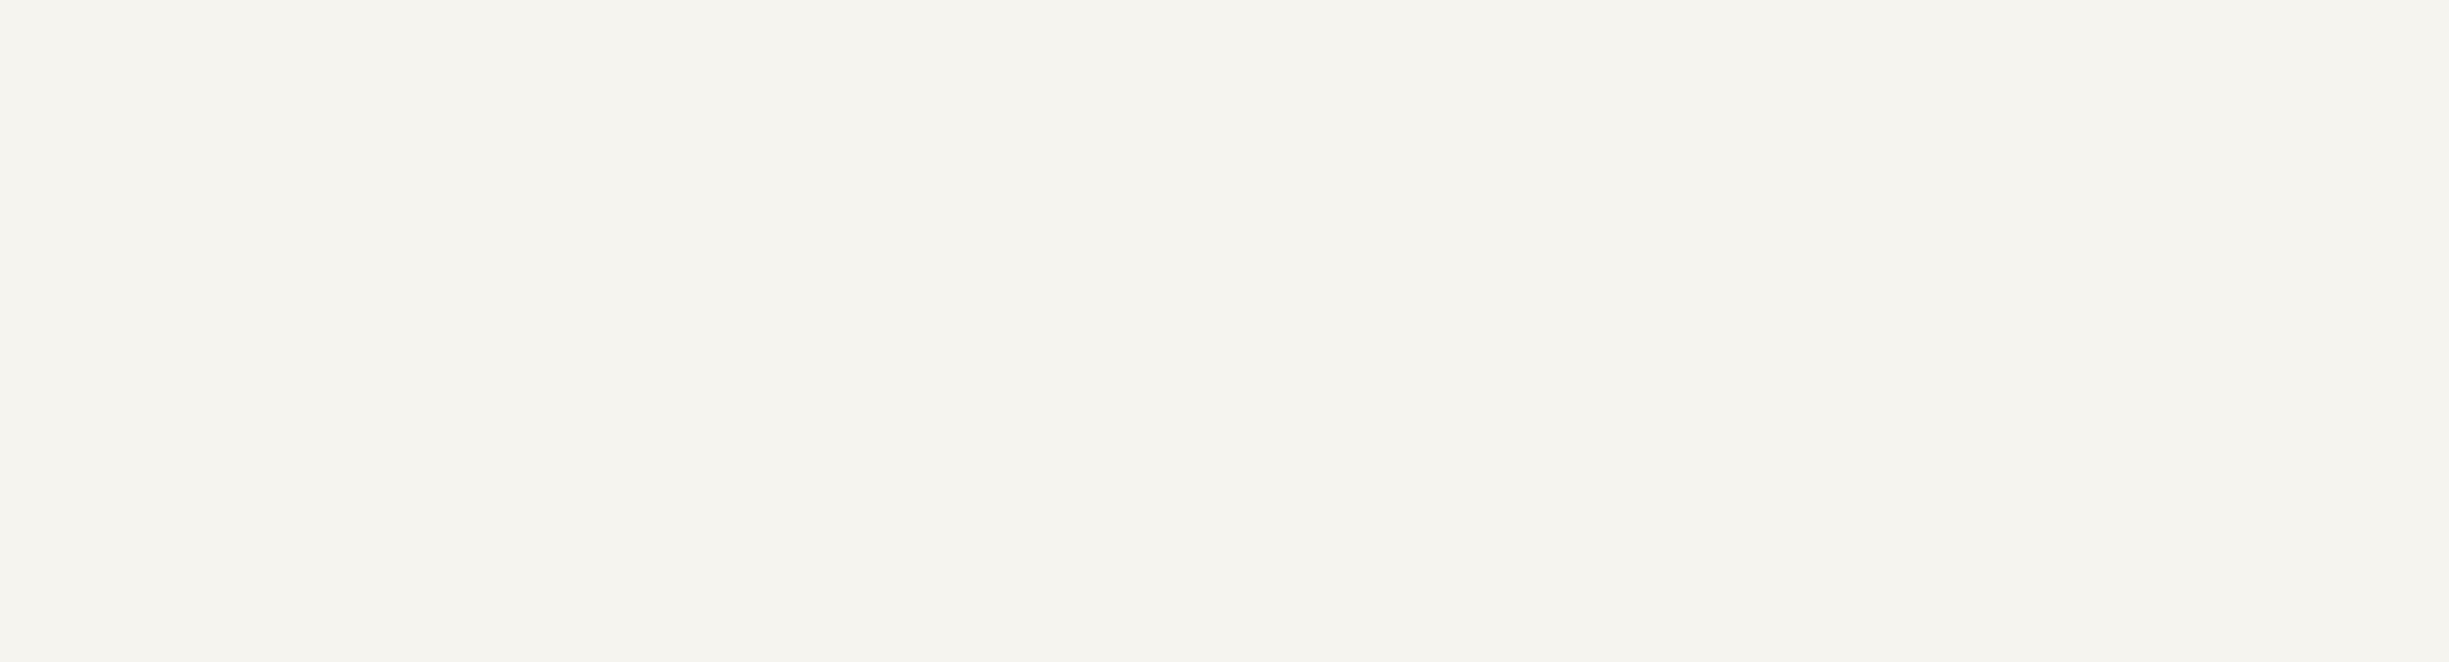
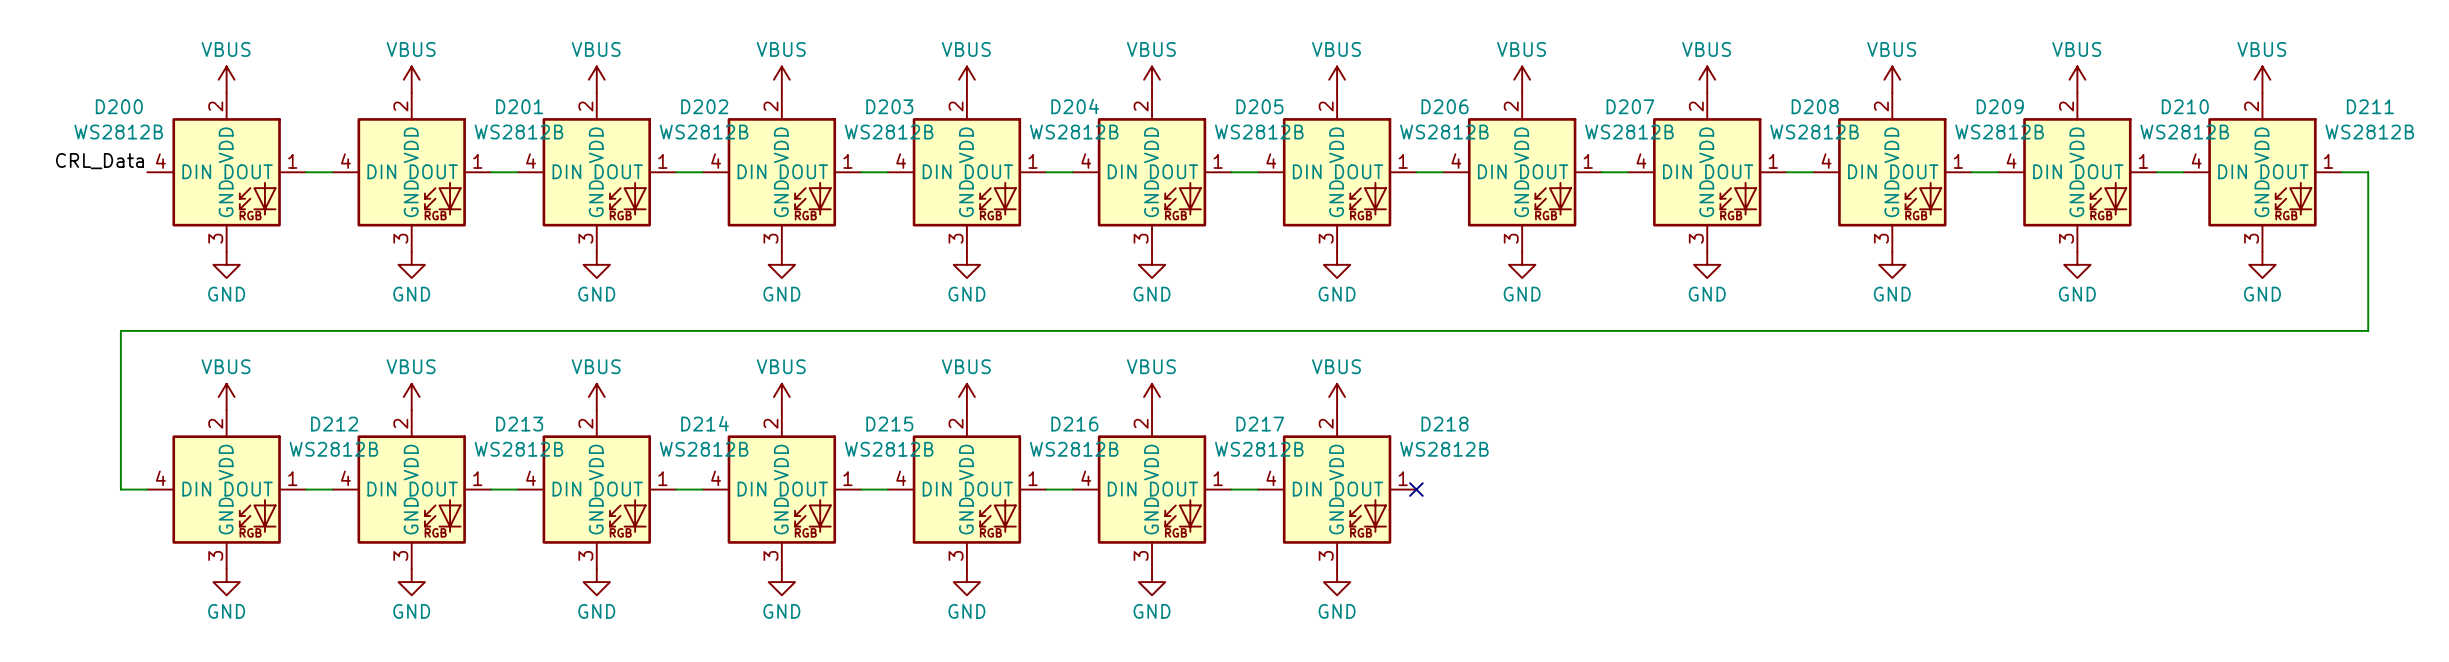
power symbol: none -> VBUS (226, 79)
power symbol: none -> VBUS (411, 79)
power symbol: none -> VBUS (596, 79)
power symbol: none -> VBUS (781, 79)
power symbol: none -> VBUS (966, 79)
power symbol: none -> VBUS (1152, 79)
power symbol: none -> VBUS (1337, 79)
power symbol: none -> VBUS (1522, 79)
power symbol: none -> VBUS (1707, 79)
power symbol: none -> VBUS (1892, 79)
power symbol: none -> VBUS (2077, 79)
power symbol: none -> VBUS (2262, 79)
label: none -> CRL_Data (100, 161)
D200: none -> WS2812B (226, 172)
wire: none -> (305, 172) (332, 172)
D201: none -> WS2812B (411, 172)
wire: none -> (491, 172) (517, 172)
D202: none -> WS2812B (596, 172)
wire: none -> (676, 172) (702, 172)
D203: none -> WS2812B (781, 172)
wire: none -> (861, 172) (887, 172)
D204: none -> WS2812B (966, 172)
wire: none -> (1046, 172) (1072, 172)
D205: none -> WS2812B (1152, 172)
wire: none -> (1231, 172) (1257, 172)
D206: none -> WS2812B (1337, 172)
wire: none -> (1416, 172) (1442, 172)
D207: none -> WS2812B (1522, 172)
wire: none -> (1601, 172) (1627, 172)
D208: none -> WS2812B (1707, 172)
wire: none -> (1786, 172) (1812, 172)
D209: none -> WS2812B (1892, 172)
wire: none -> (1971, 172) (1998, 172)
D210: none -> WS2812B (2077, 172)
wire: none -> (2156, 172) (2183, 172)
D211: none -> WS2812B (2262, 172)
wire: none -> (2341, 172) (2368, 172) (2368, 330) (120, 330) (120, 489) (147, 489)
power symbol: none -> GND (226, 264)
power symbol: none -> GND (411, 264)
power symbol: none -> GND (596, 264)
power symbol: none -> GND (781, 264)
power symbol: none -> GND (966, 264)
power symbol: none -> GND (1152, 264)
power symbol: none -> GND (1337, 264)
power symbol: none -> GND (1522, 264)
power symbol: none -> GND (1707, 264)
power symbol: none -> GND (1892, 264)
power symbol: none -> GND (2077, 264)
power symbol: none -> GND (2262, 264)
power symbol: none -> VBUS (226, 397)
power symbol: none -> VBUS (411, 397)
power symbol: none -> VBUS (596, 397)
power symbol: none -> VBUS (781, 397)
power symbol: none -> VBUS (966, 397)
power symbol: none -> VBUS (1152, 397)
power symbol: none -> VBUS (1337, 397)
D212: none -> WS2812B (226, 489)
wire: none -> (305, 489) (332, 489)
D213: none -> WS2812B (411, 489)
wire: none -> (491, 489) (517, 489)
D214: none -> WS2812B (596, 489)
wire: none -> (676, 489) (702, 489)
D215: none -> WS2812B (781, 489)
wire: none -> (861, 489) (887, 489)
D216: none -> WS2812B (966, 489)
wire: none -> (1046, 489) (1072, 489)
D217: none -> WS2812B (1152, 489)
wire: none -> (1231, 489) (1257, 489)
D218: none -> WS2812B (1337, 489)
no-connect mark: none -> (1416, 489)
power symbol: none -> GND (226, 582)
power symbol: none -> GND (411, 582)
power symbol: none -> GND (596, 582)
power symbol: none -> GND (781, 582)
power symbol: none -> GND (966, 582)
power symbol: none -> GND (1152, 582)
power symbol: none -> GND (1337, 582)

